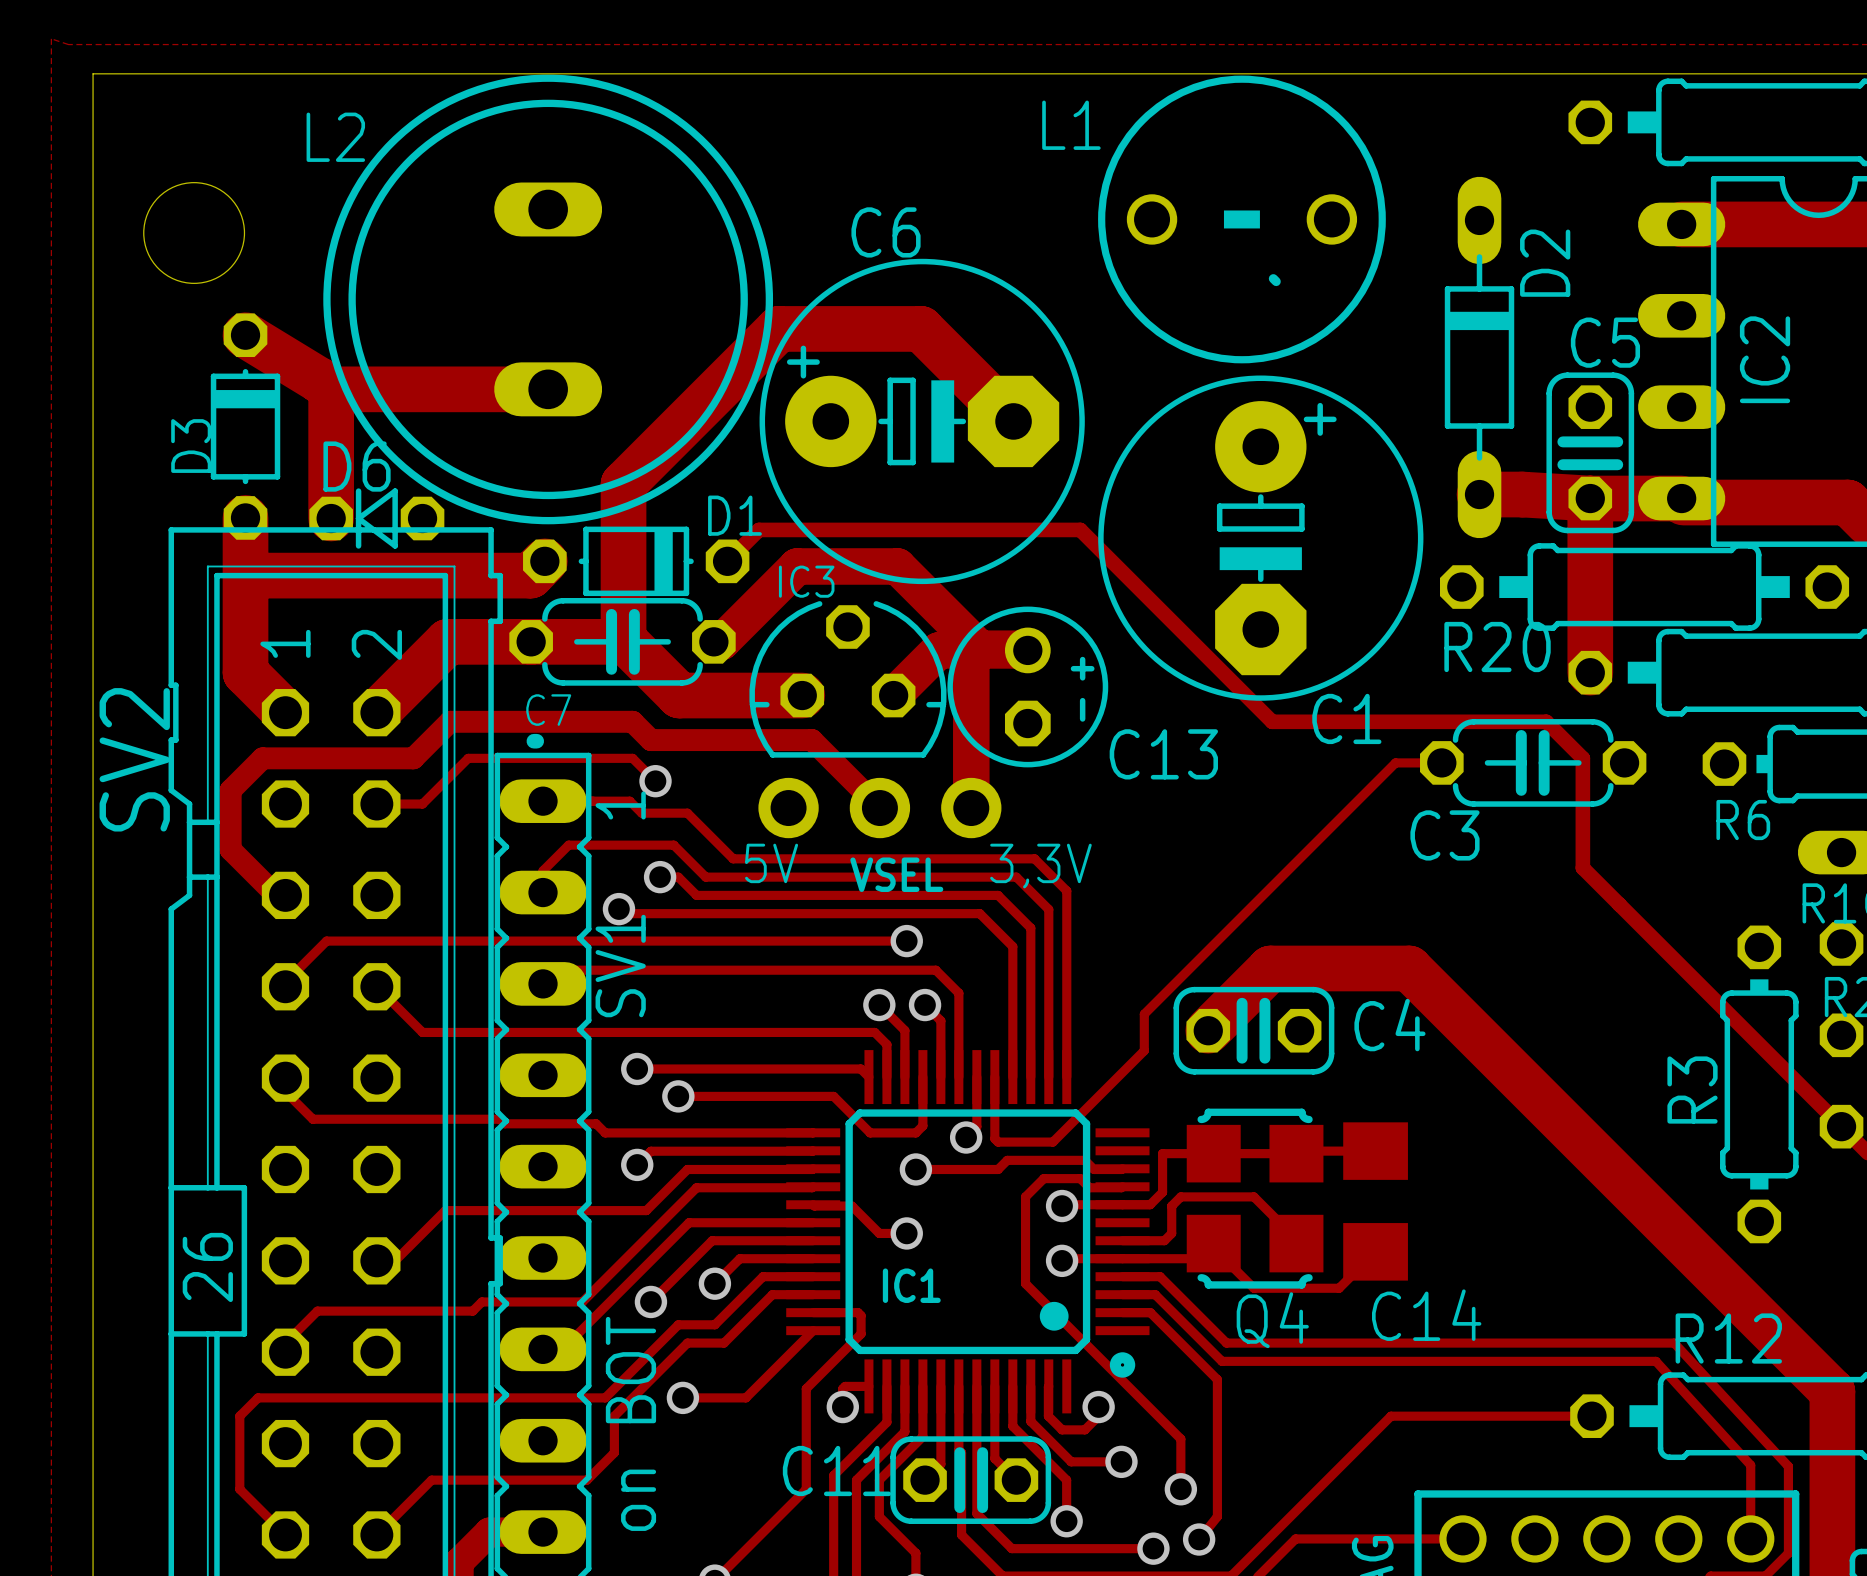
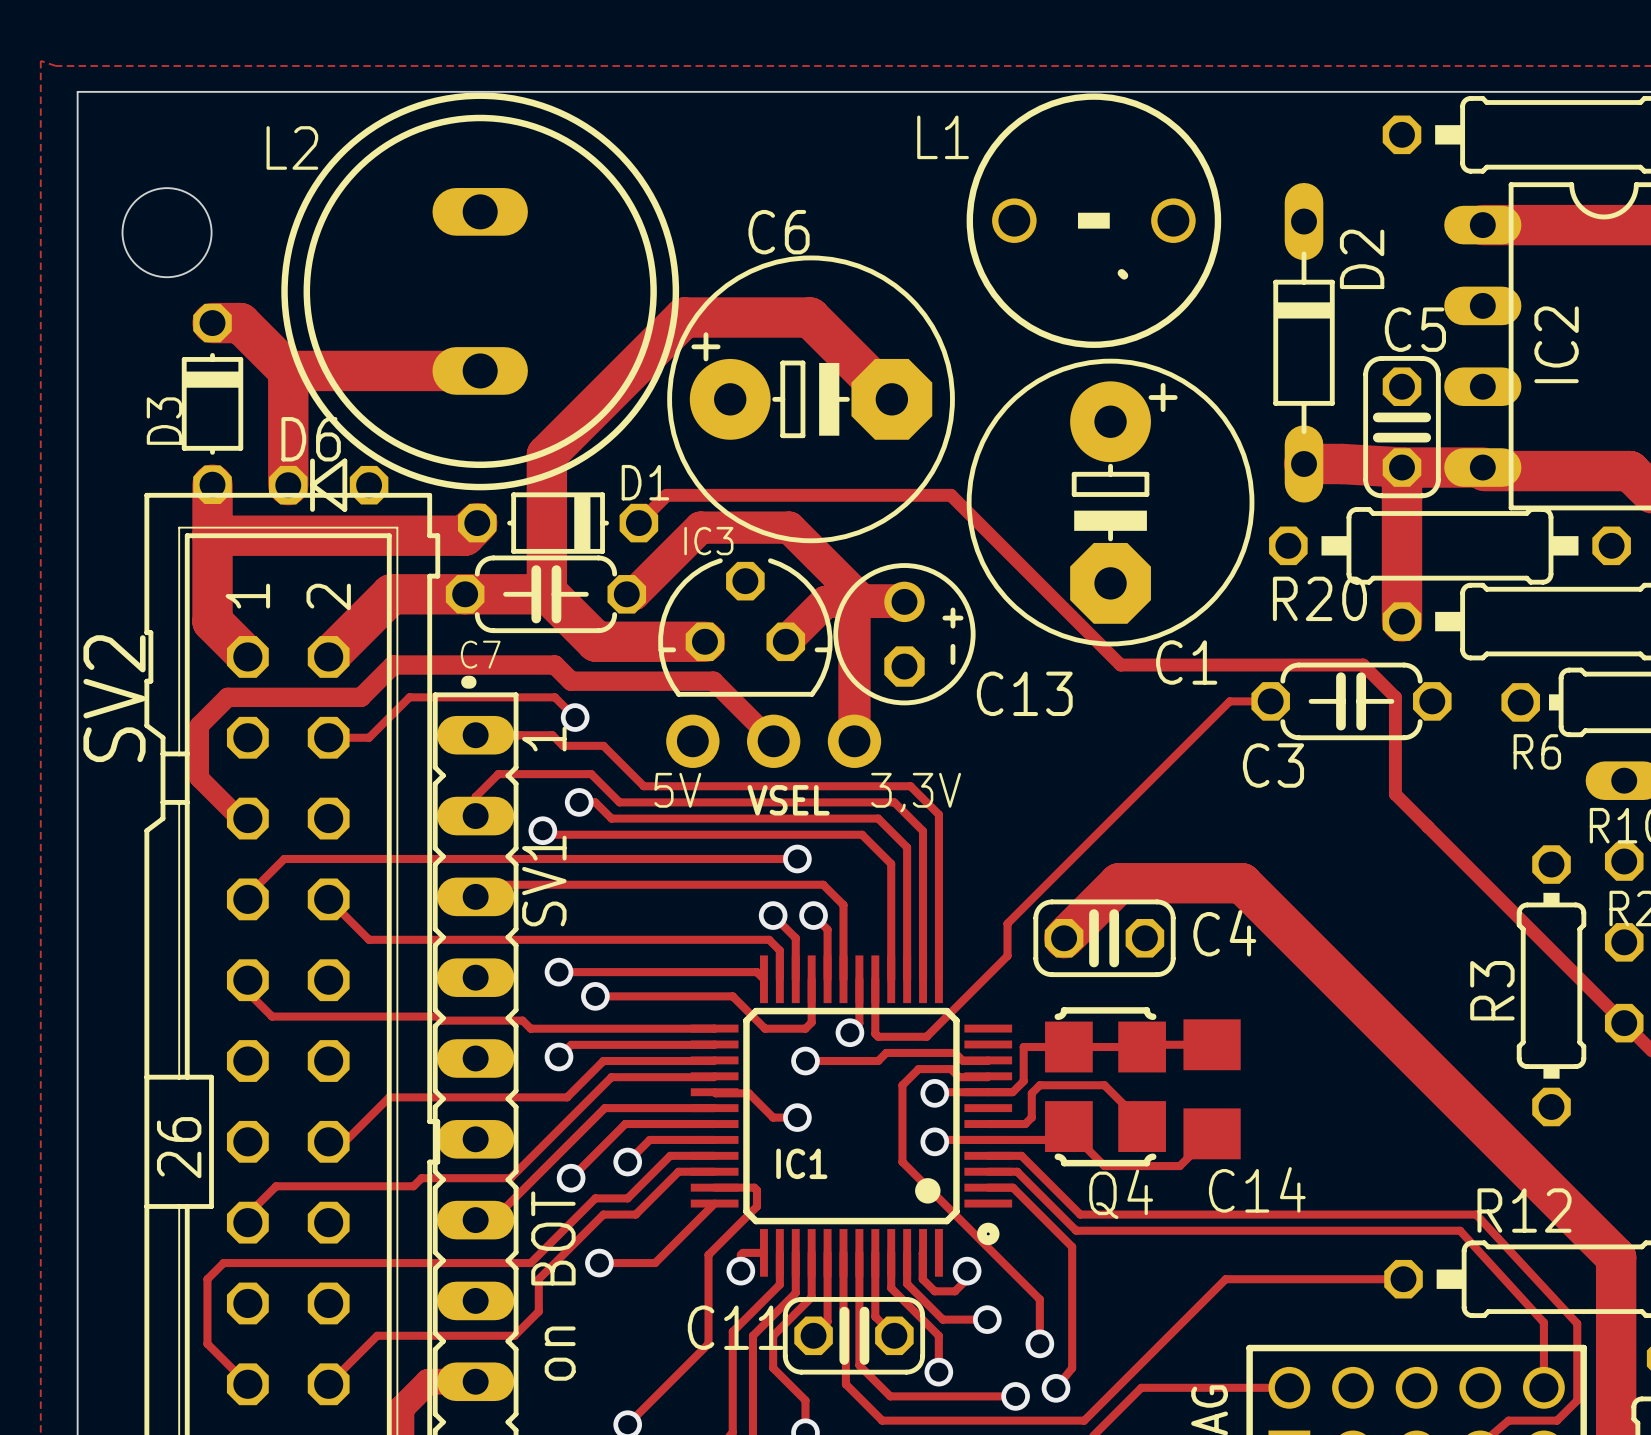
track: (245, 335) (331, 389) -> (212, 323) (240, 323) (288, 370)

